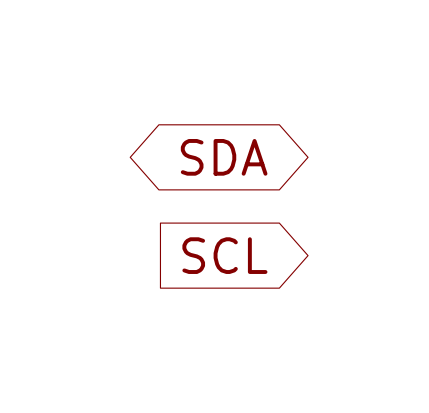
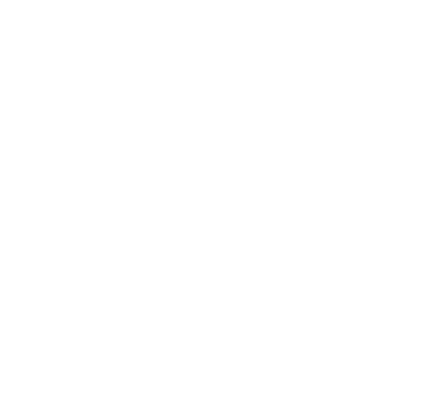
global label: SDA (224, 157) -> none
global label: SCL (224, 255) -> none

